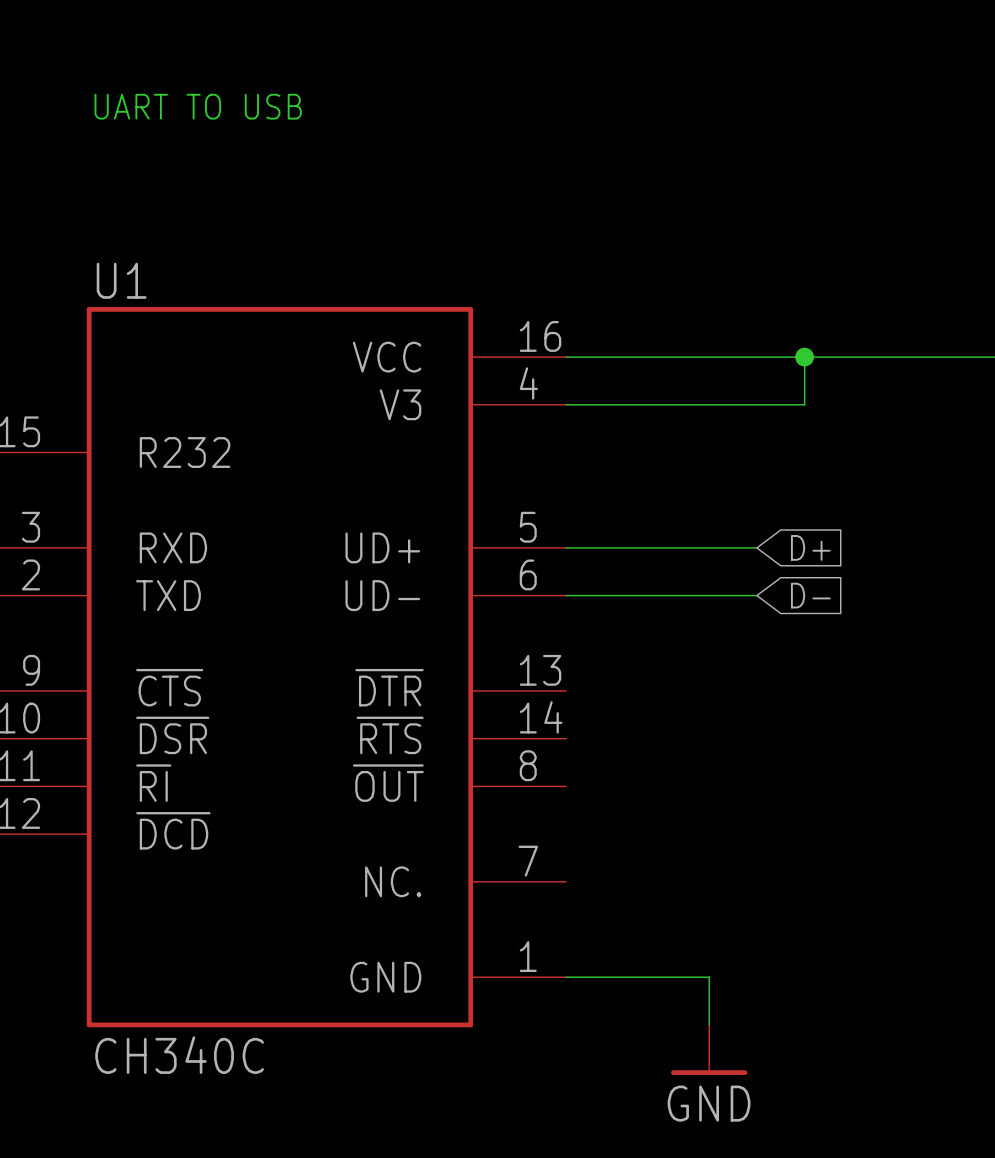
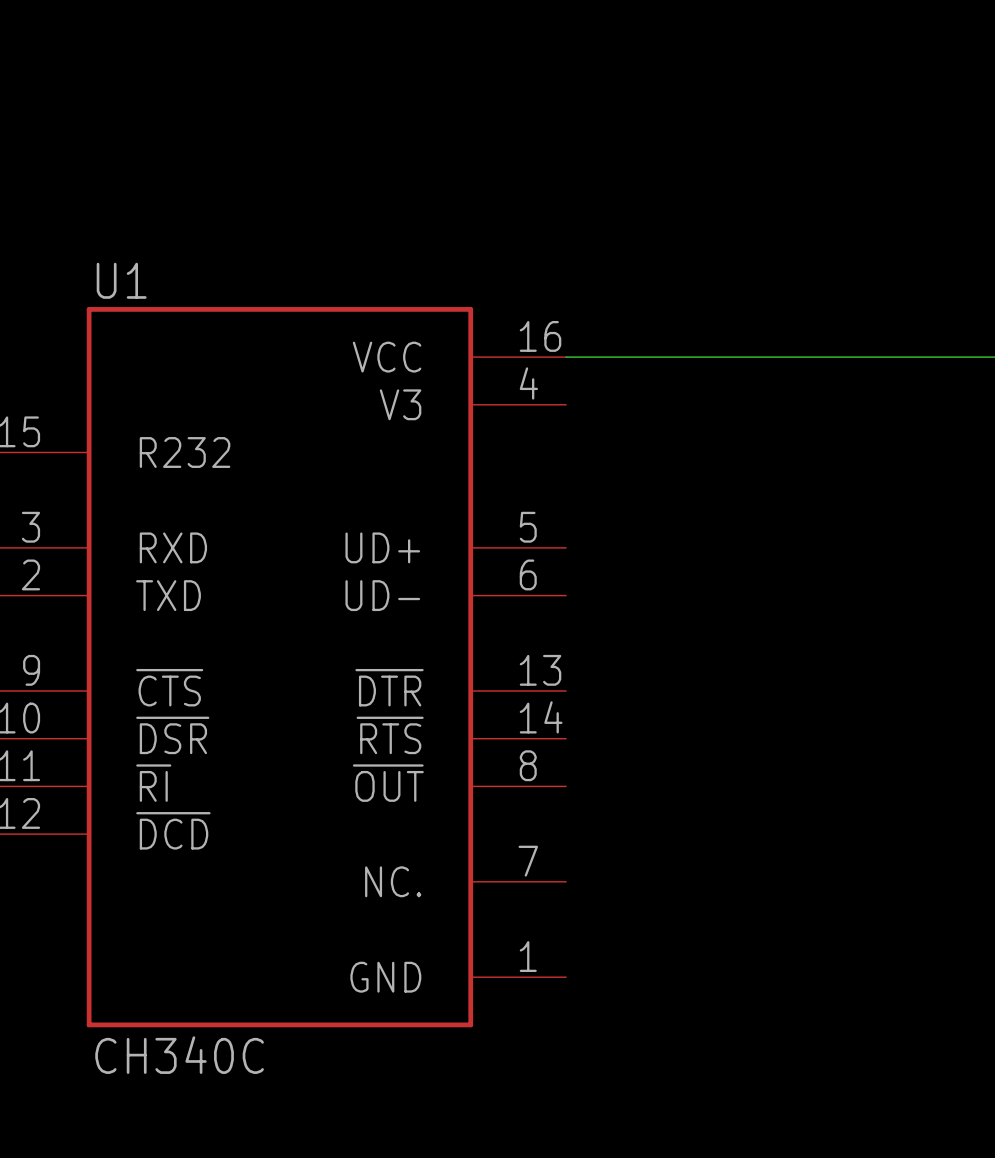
text: UART TO USB (198, 106) -> none
wire: (804, 357) (804, 404) (566, 404) -> none
junction: (804, 357) -> none
wire: (566, 547) (756, 547) -> none
global label: D+ (810, 547) -> none
wire: (566, 595) (756, 595) -> none
global label: D- (810, 595) -> none
wire: (566, 977) (709, 977) (709, 1024) -> none
power symbol: GND (709, 1049) -> none

